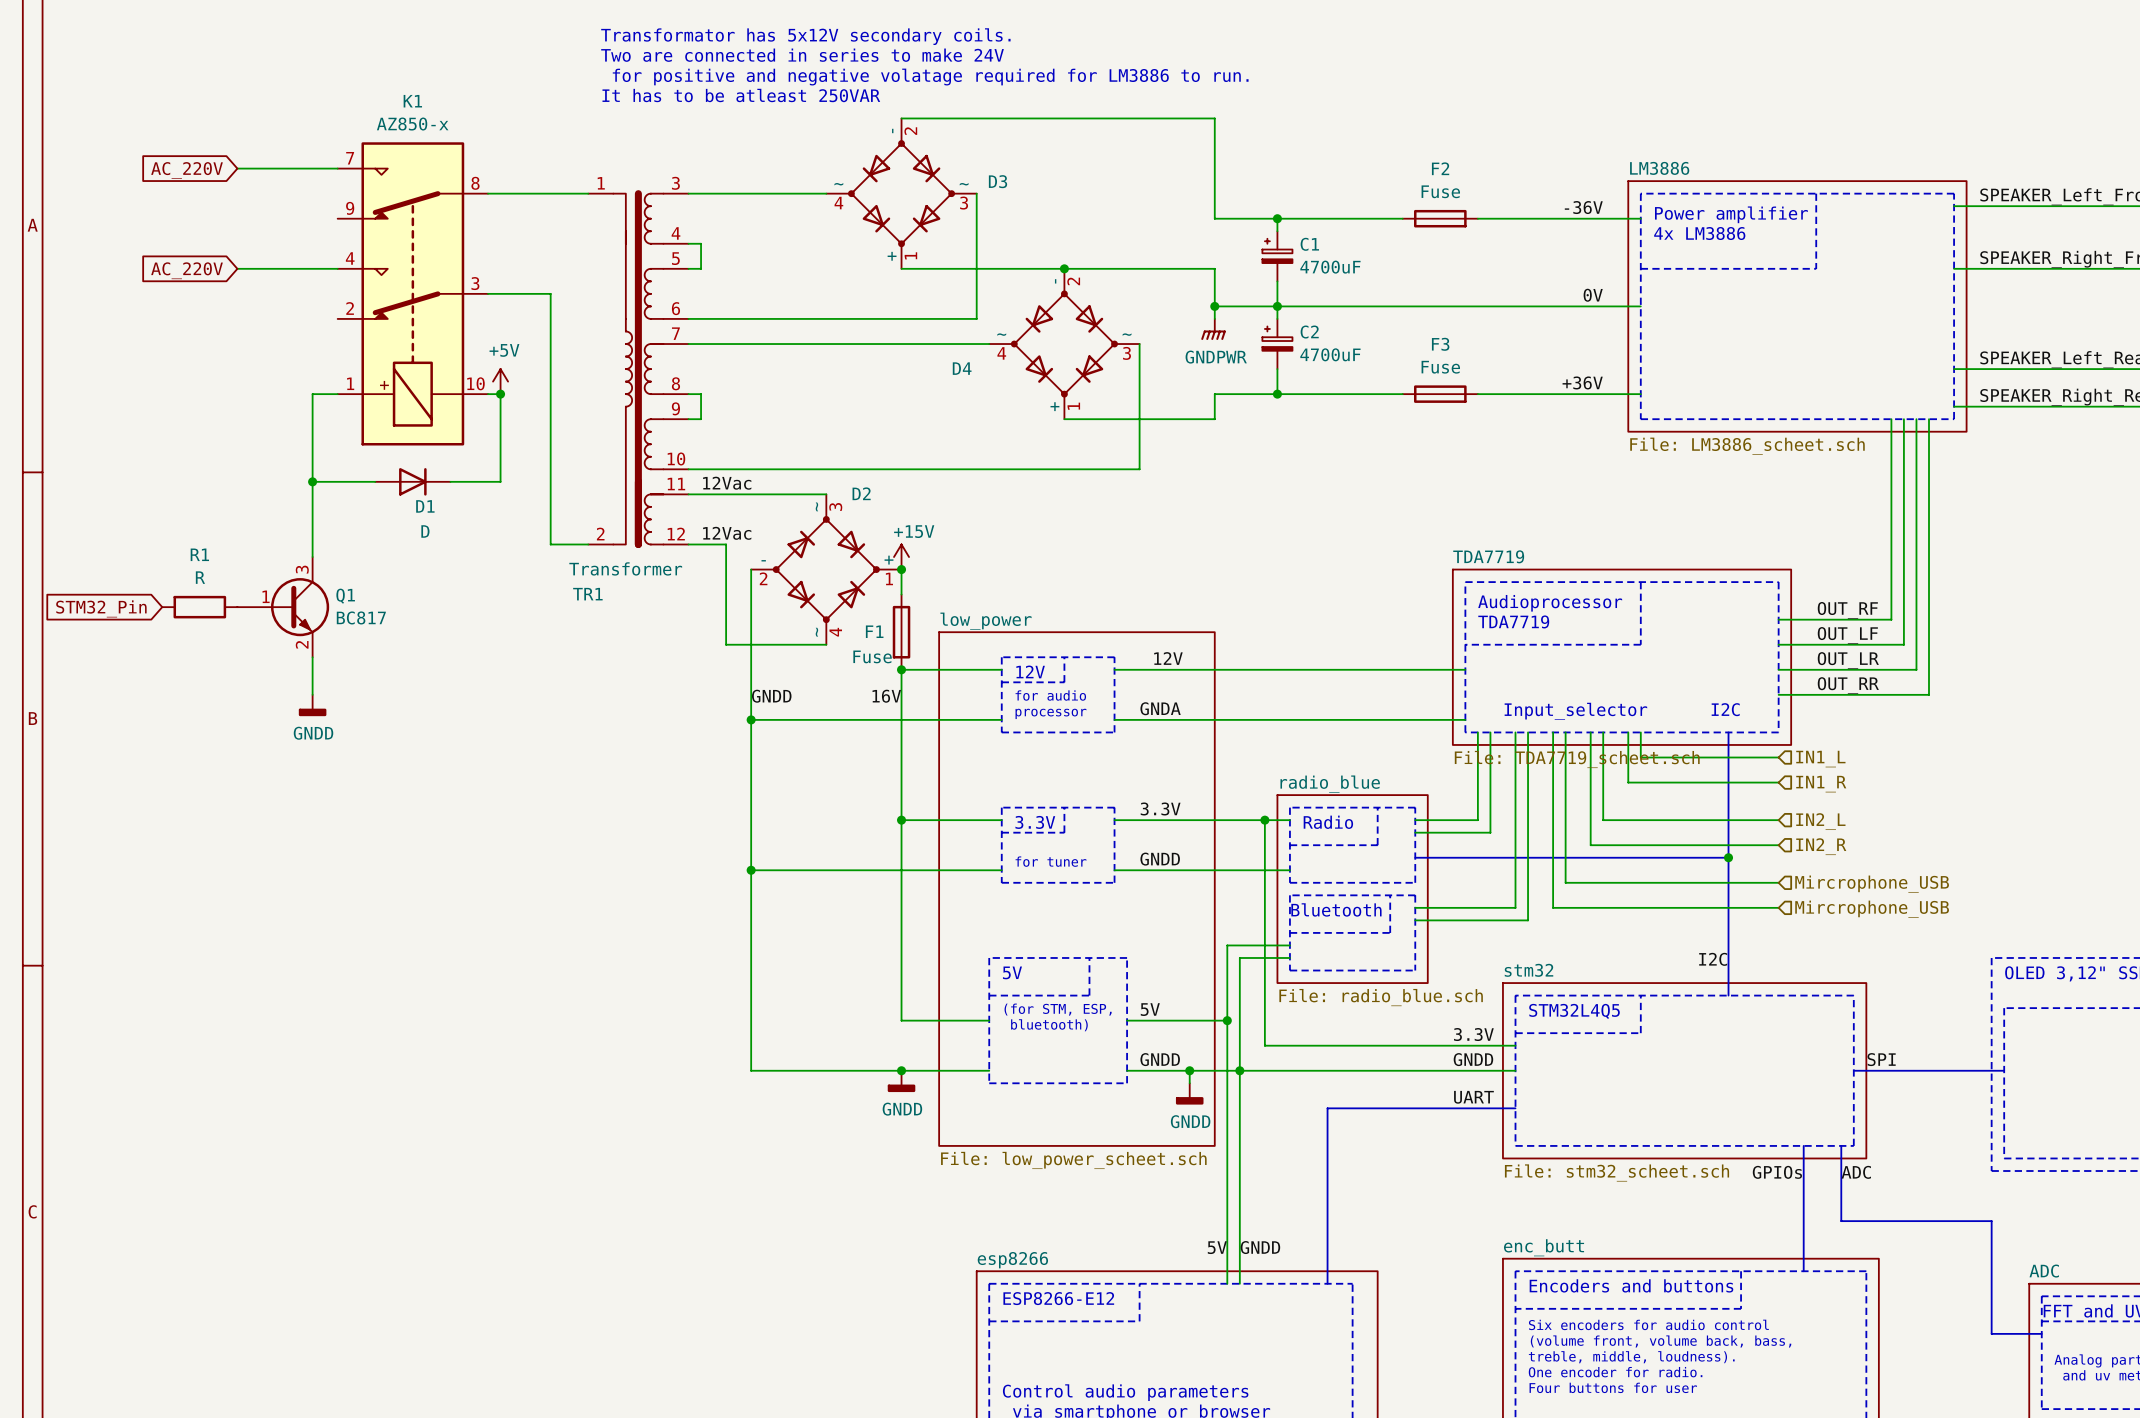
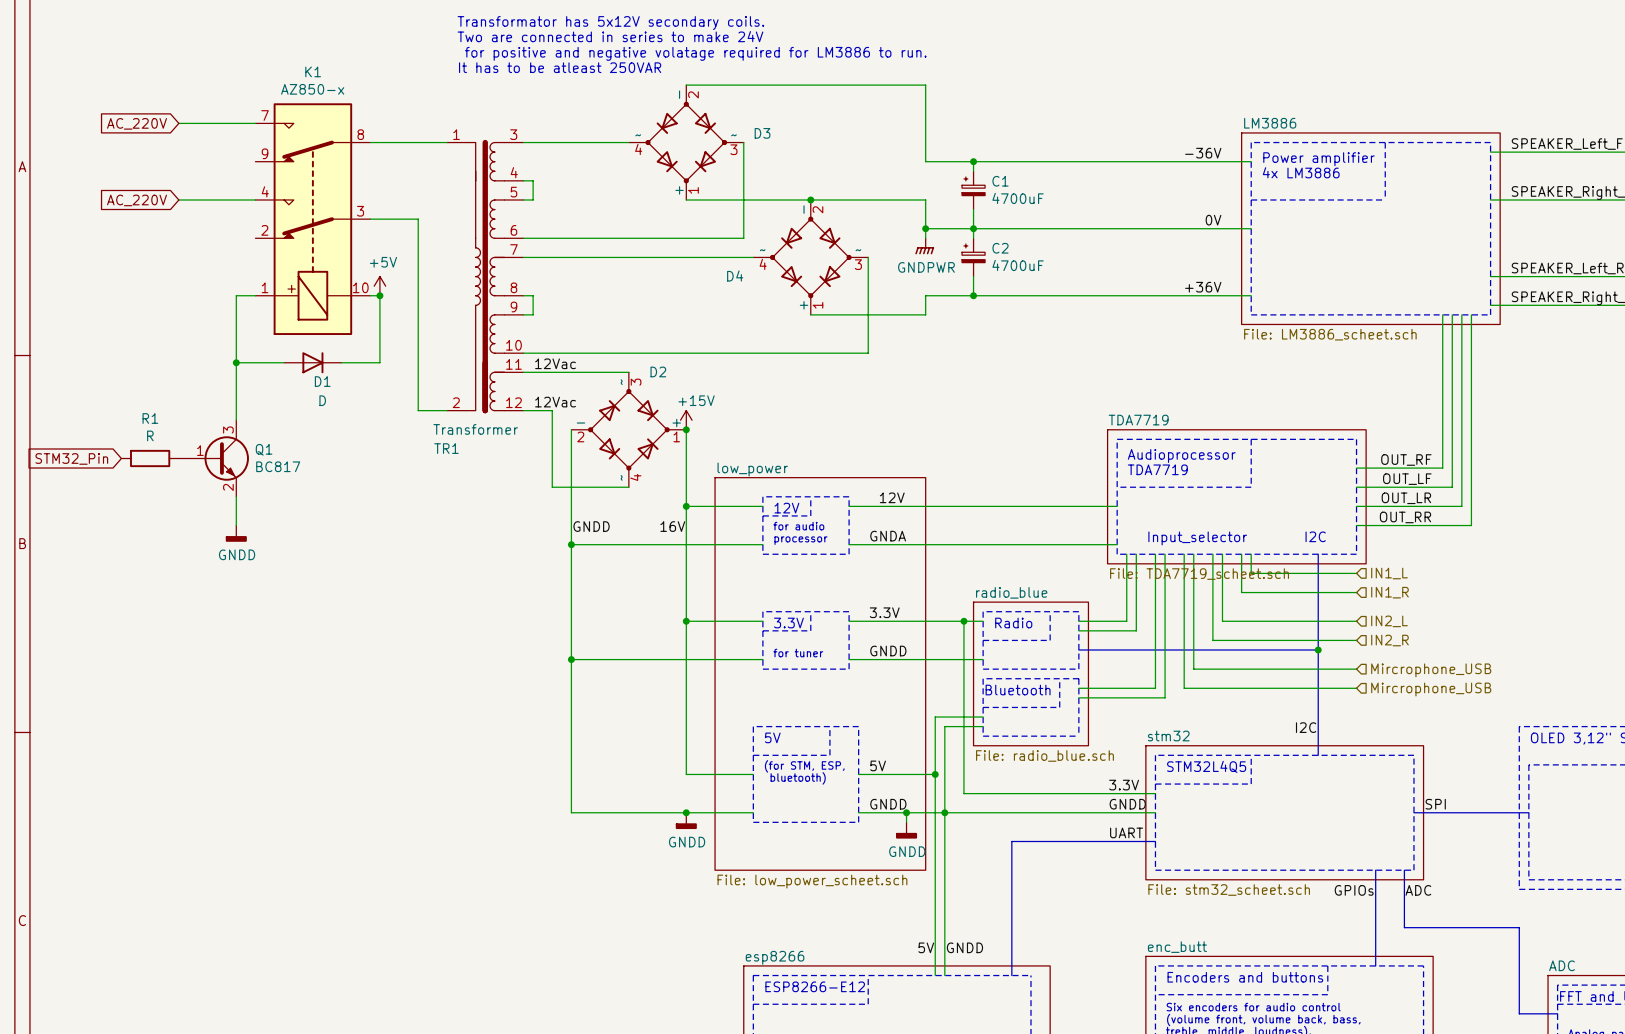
F2: Fuse (1440, 218) -> none
F3: Fuse (1440, 394) -> none
F1: Fuse (901, 632) -> none

